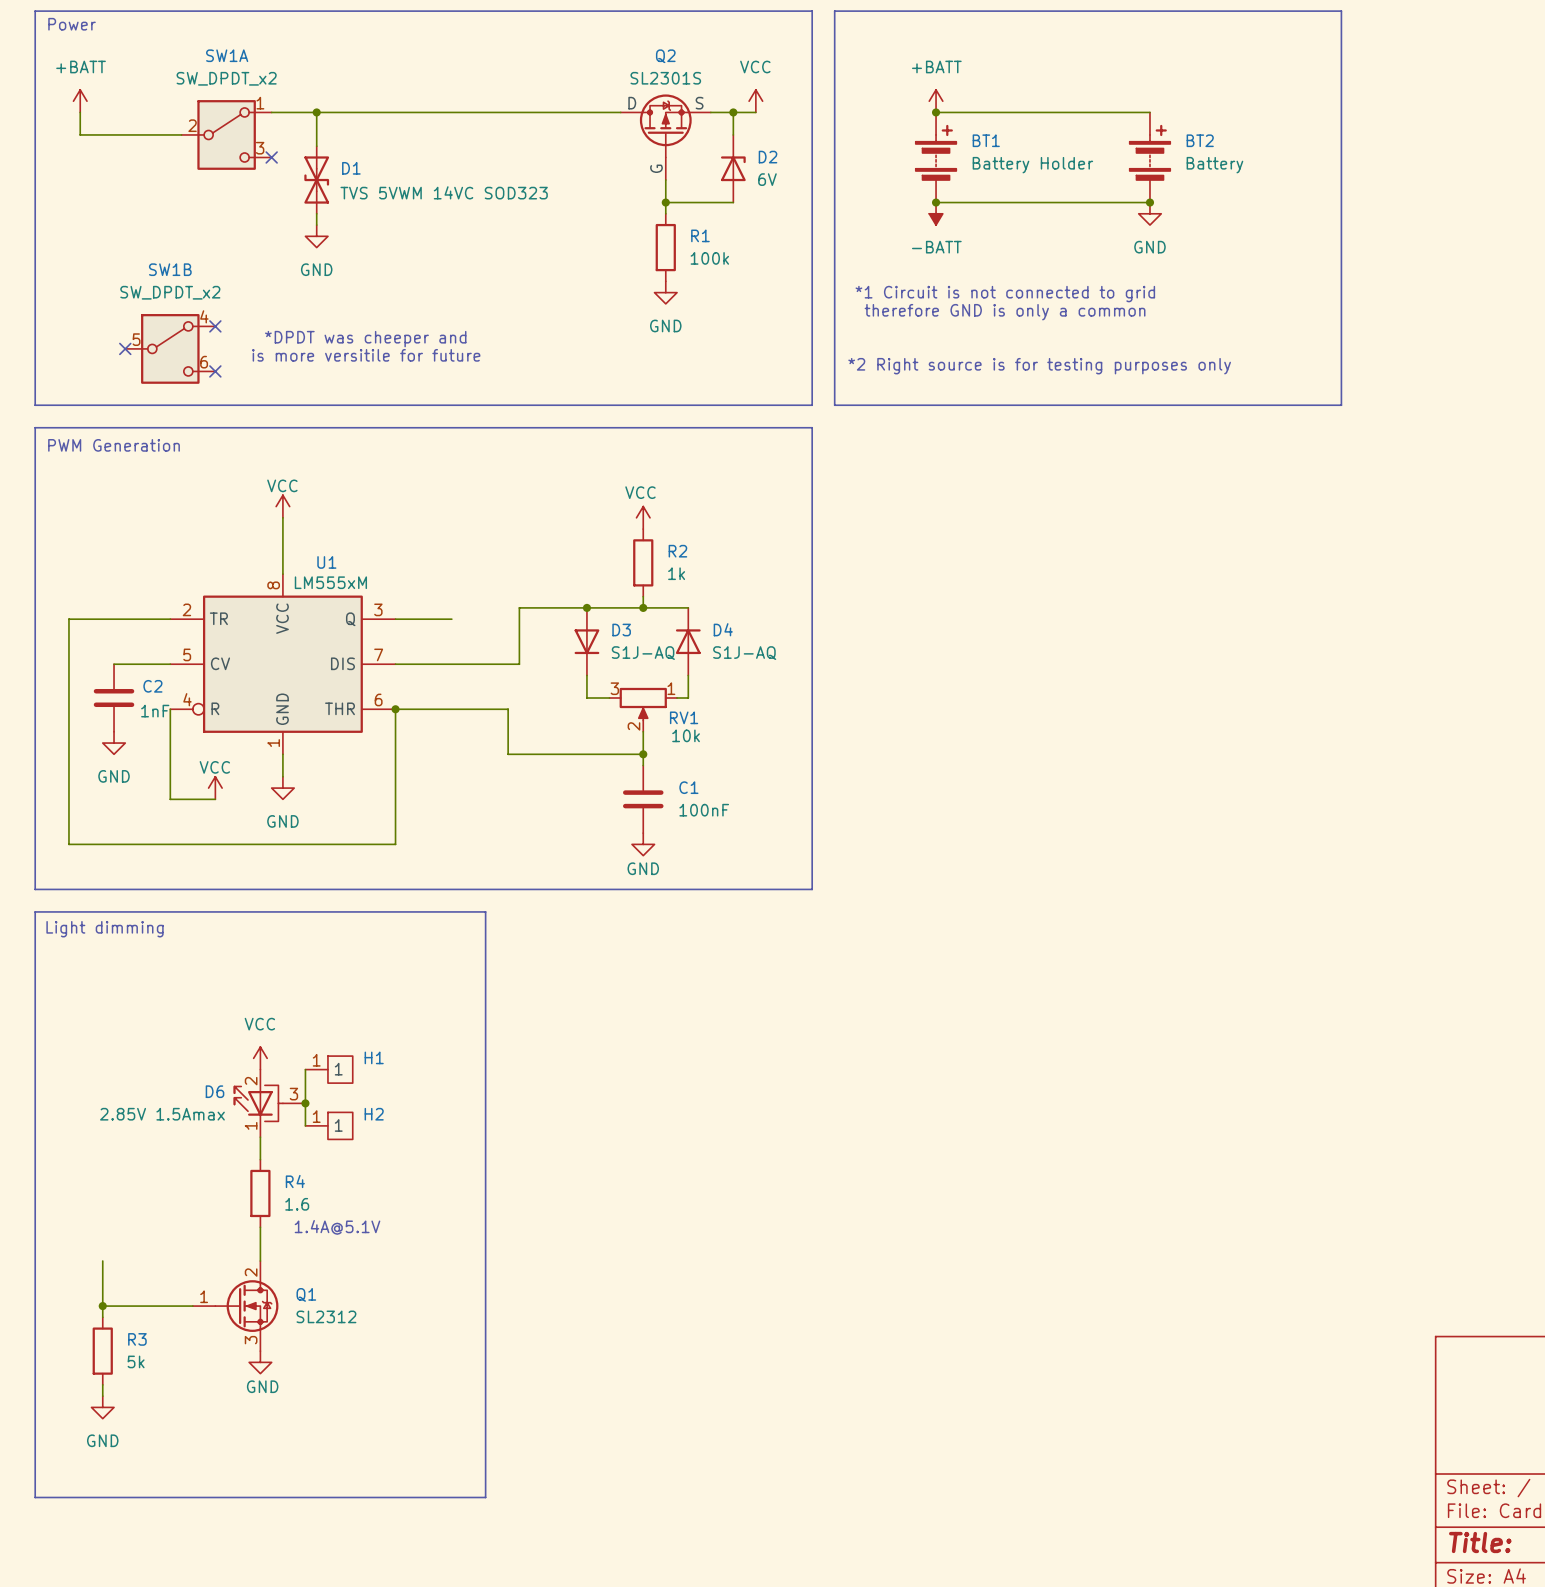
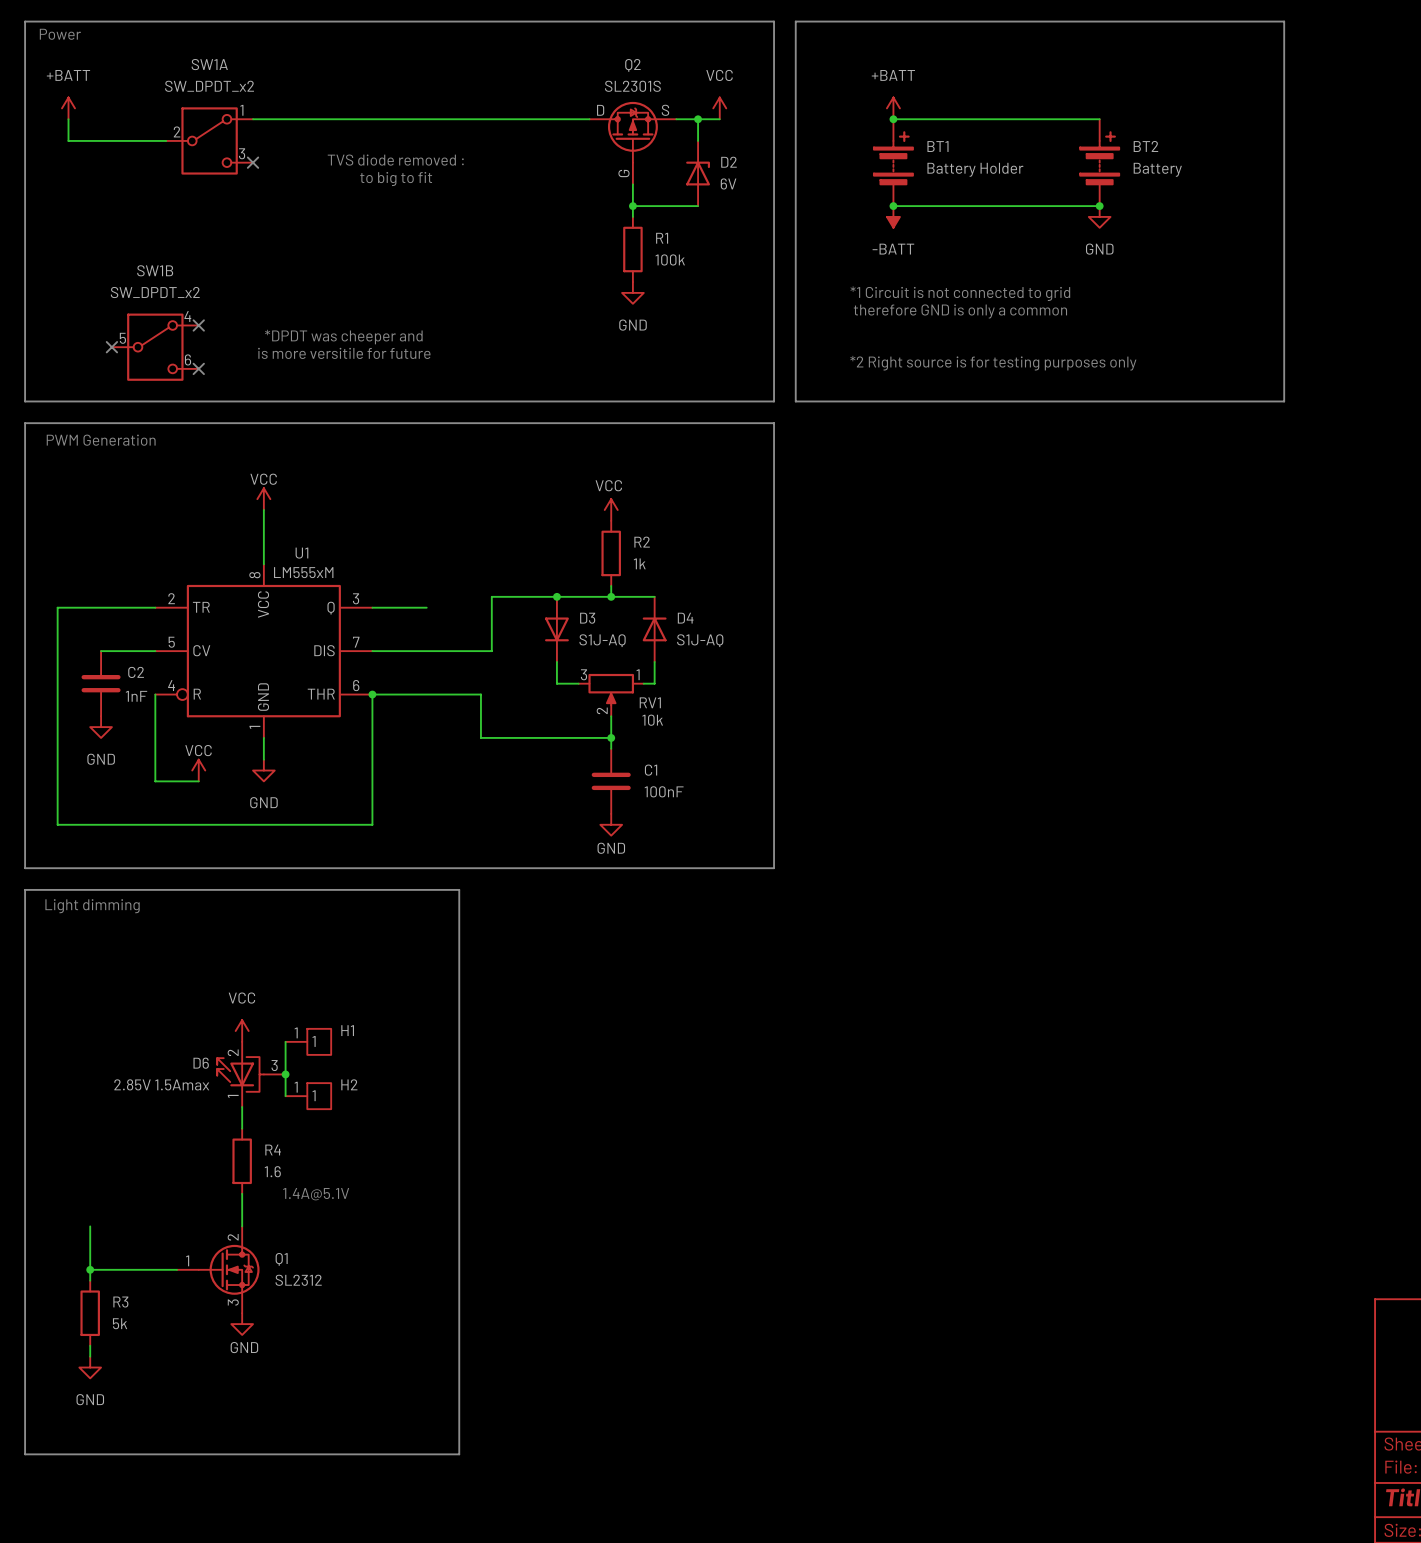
wire: (316, 112) (316, 146) -> none
junction: (316, 112) -> none
text: none -> TVS diode removed : (395, 160)
text: none -> to big to fit (396, 179)
D1: TVS 5VWM 14VC SOD323 (316, 180) -> none
wire: (316, 213) (316, 225) -> none
power symbol: GND (316, 236) -> none

